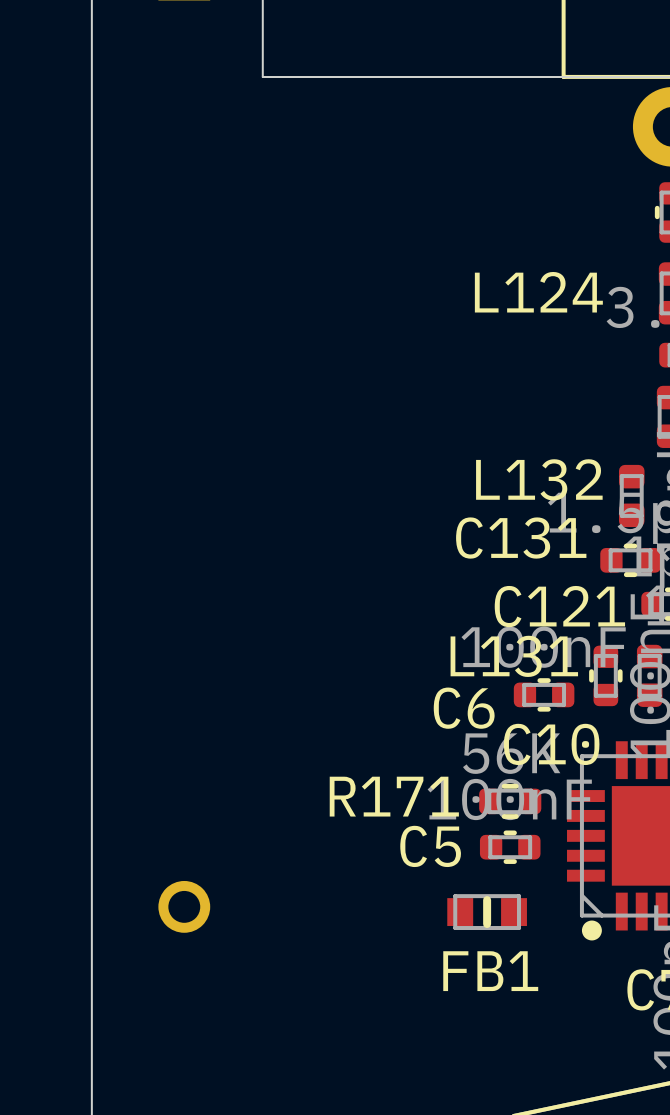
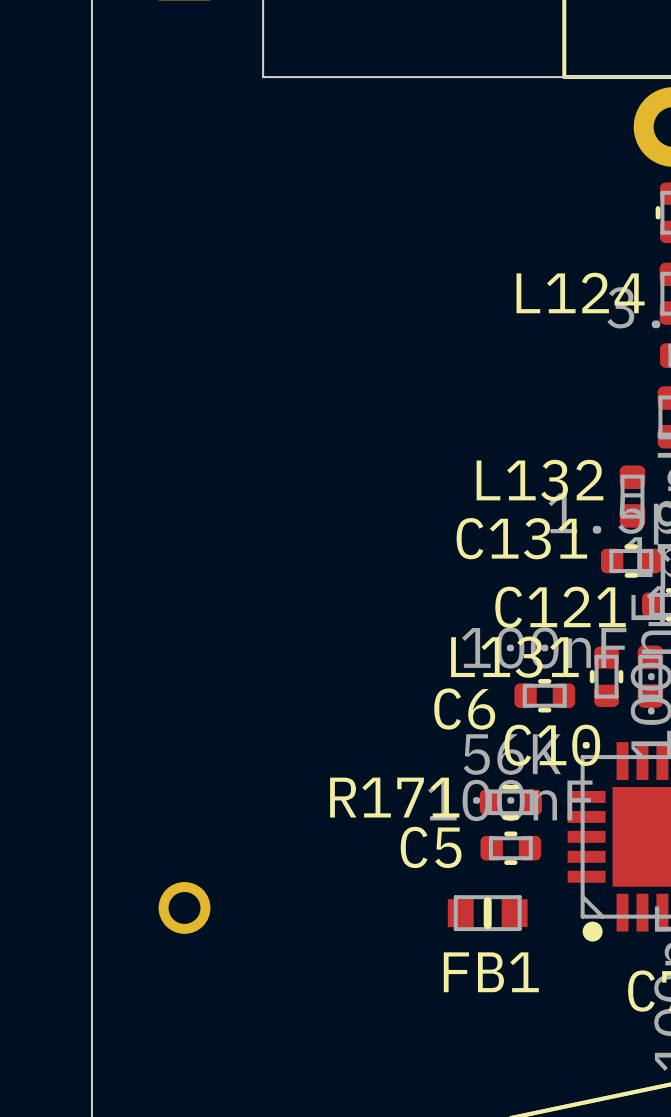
L124 name position: L124 (538, 292) -> L124 (580, 292)

